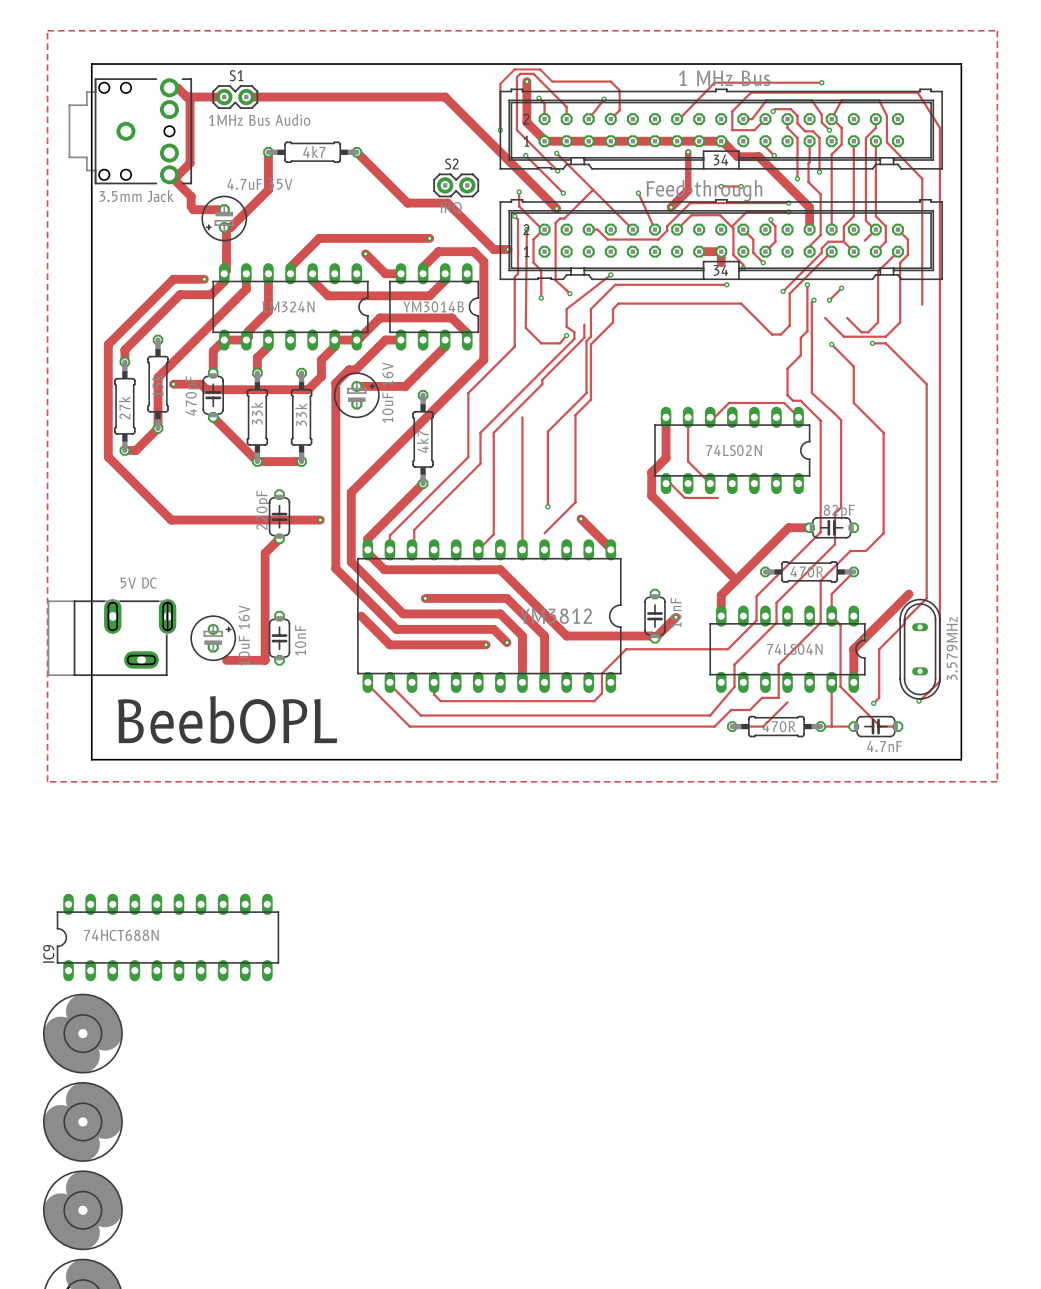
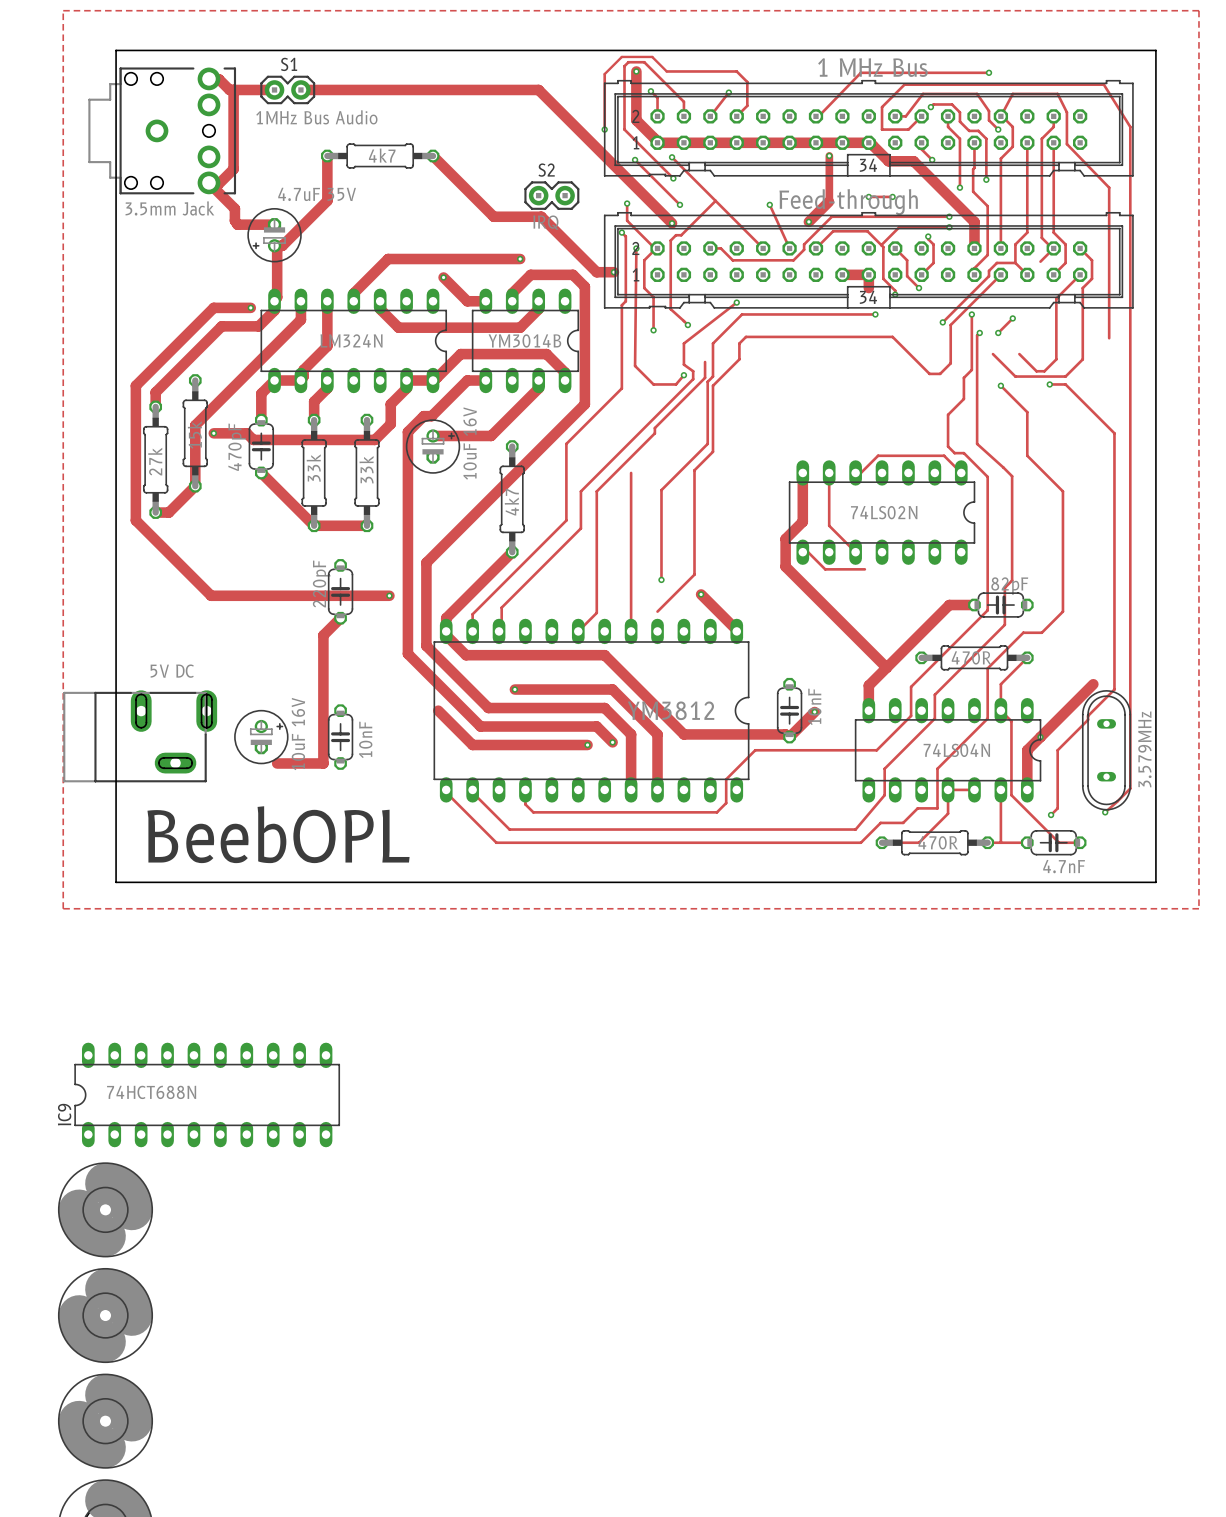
track: none -> (974, 789) (948, 789) (948, 813)

